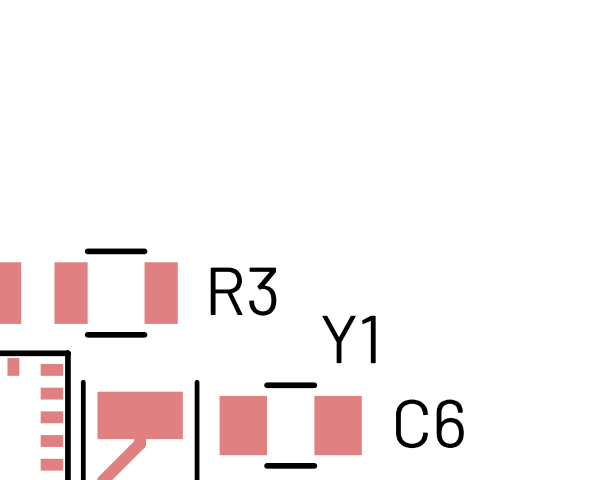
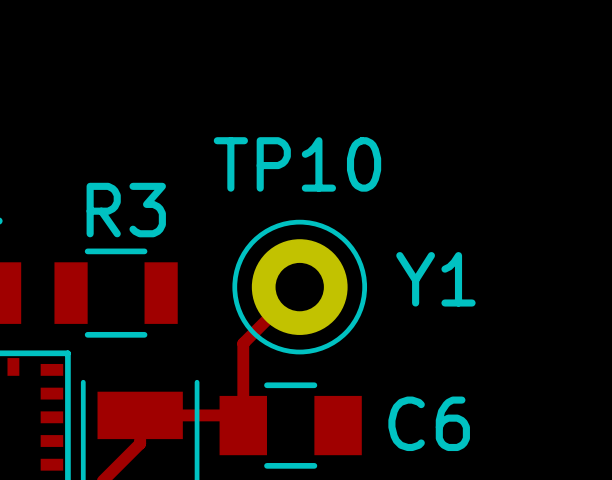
top track: none -> (299, 287) (243, 343) (243, 425) (233, 415) (140, 415)
TP10: none -> (299, 287)
R3 name position: R3 (243, 291) -> R3 (126, 210)
Y1 name position: Y1 (349, 339) -> Y1 (435, 279)

